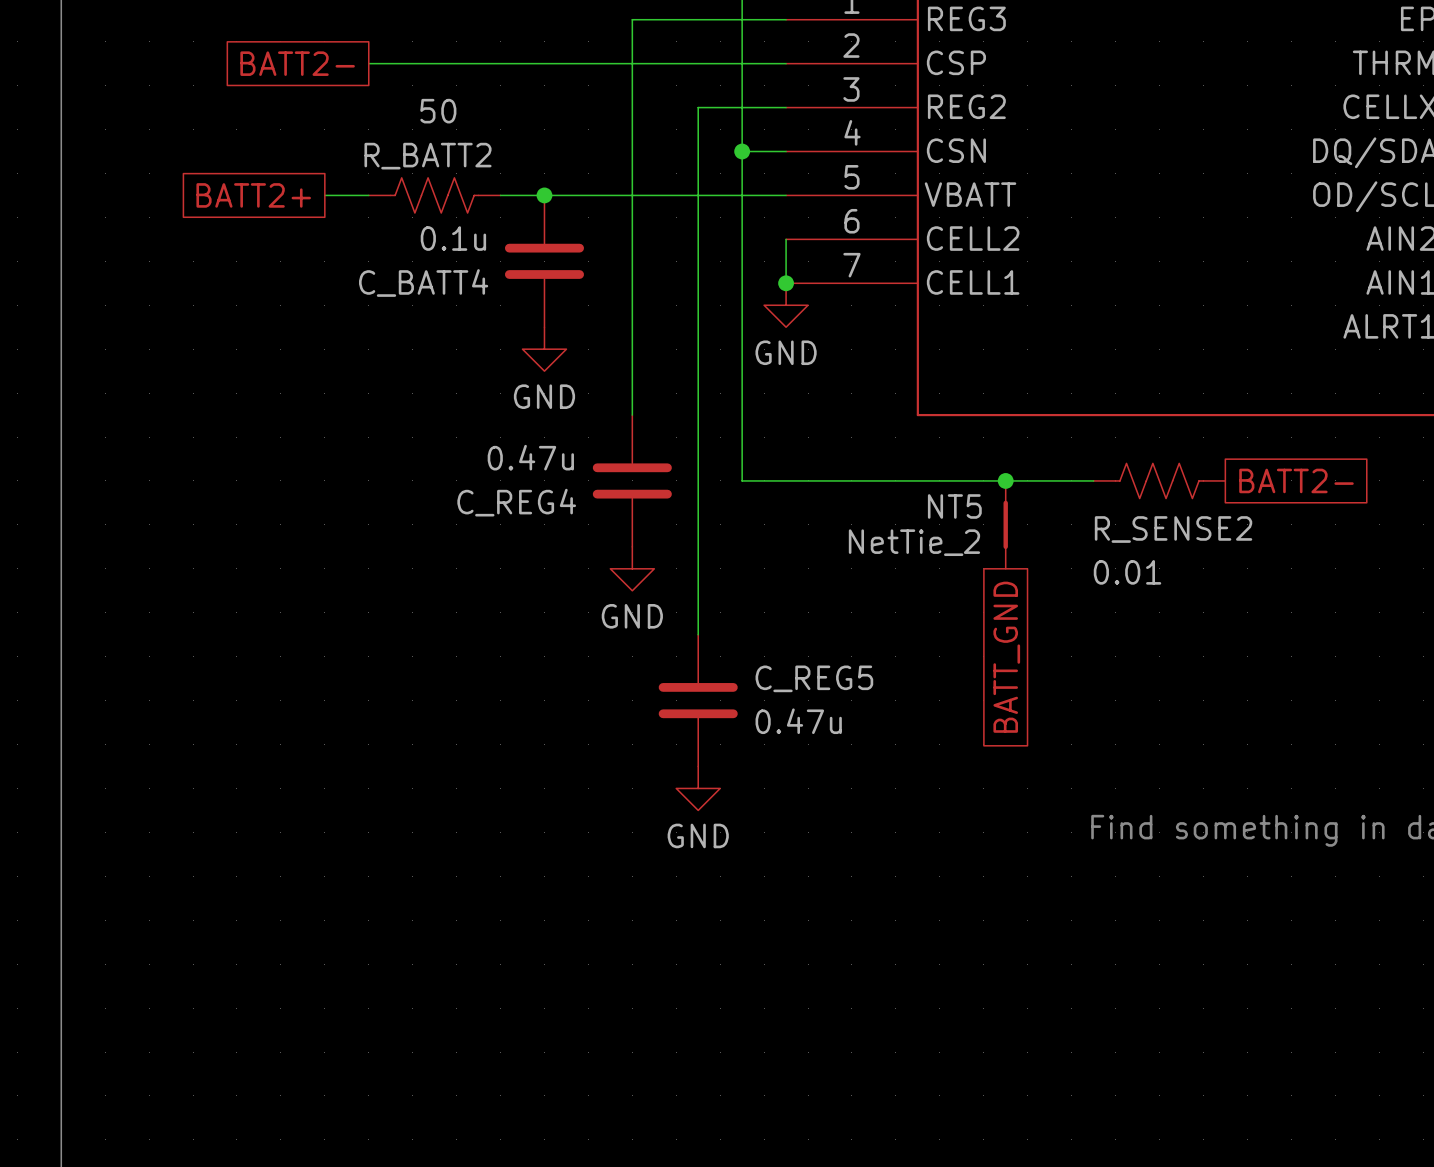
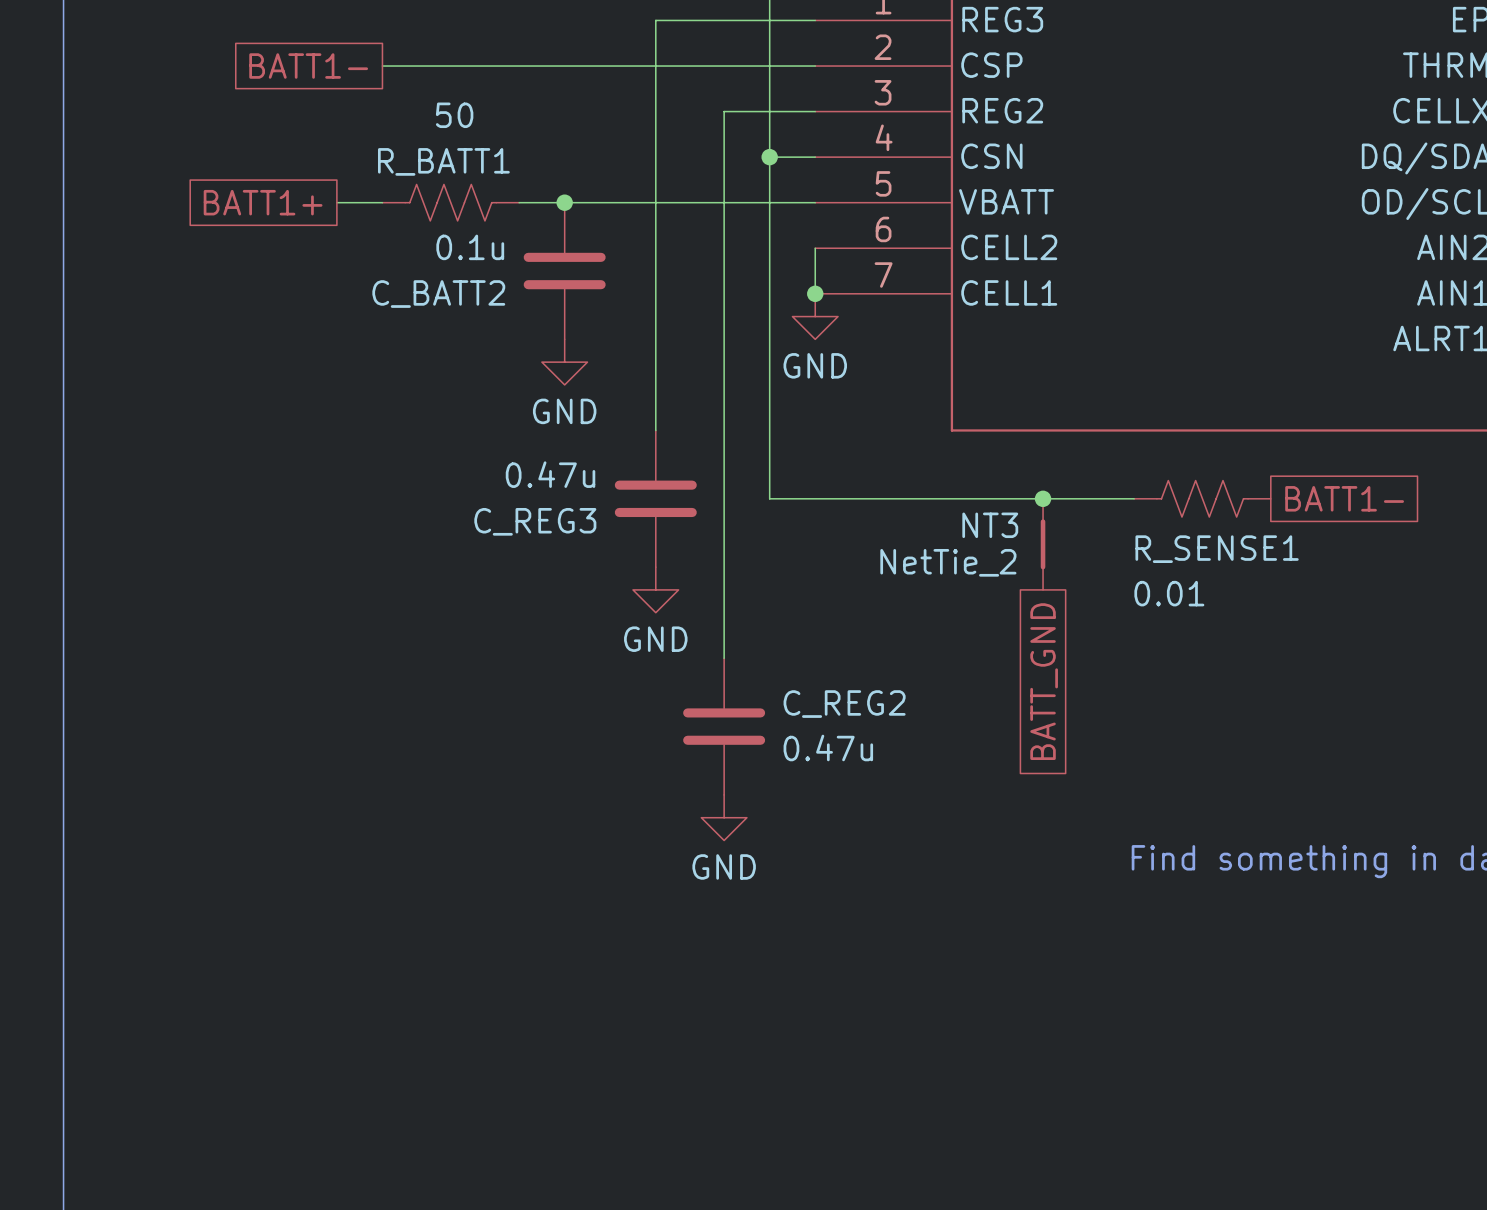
global label: BATT2- (297, 63) -> BATT1- (308, 66)
R_BATT2 name: R_BATT2 (428, 156) -> R_BATT1 (443, 161)
global label: BATT2+ (253, 195) -> BATT1+ (263, 202)
C_BATT4 name: C_BATT4 (423, 282) -> C_BATT2 (438, 294)
global label: BATT2- (1296, 480) -> BATT1- (1344, 498)
C_REG4 name: C_REG4 (516, 502) -> C_REG3 (535, 521)
NT5 name: NT5 (954, 506) -> NT3 (990, 525)
R_SENSE2 name: R_SENSE2 (1173, 529) -> R_SENSE1 (1217, 549)
C_REG5 name: C_REG5 (814, 678) -> C_REG2 (844, 704)

